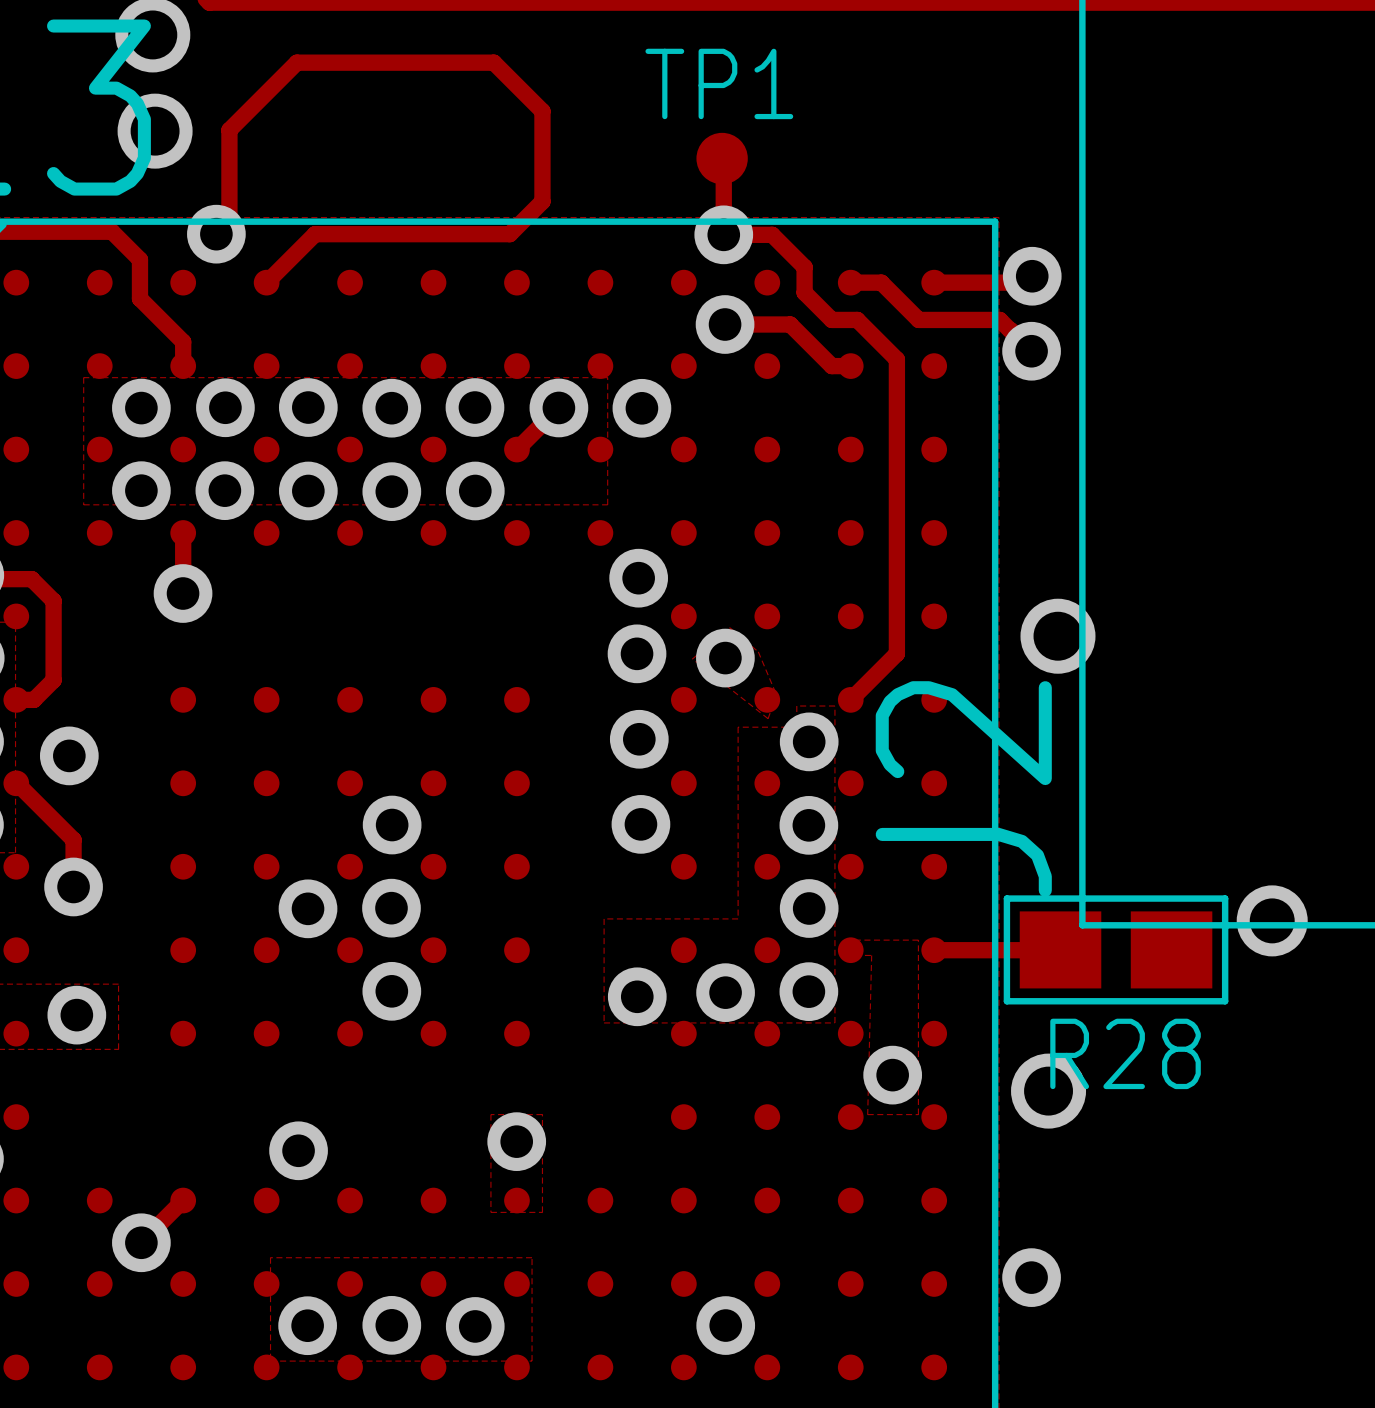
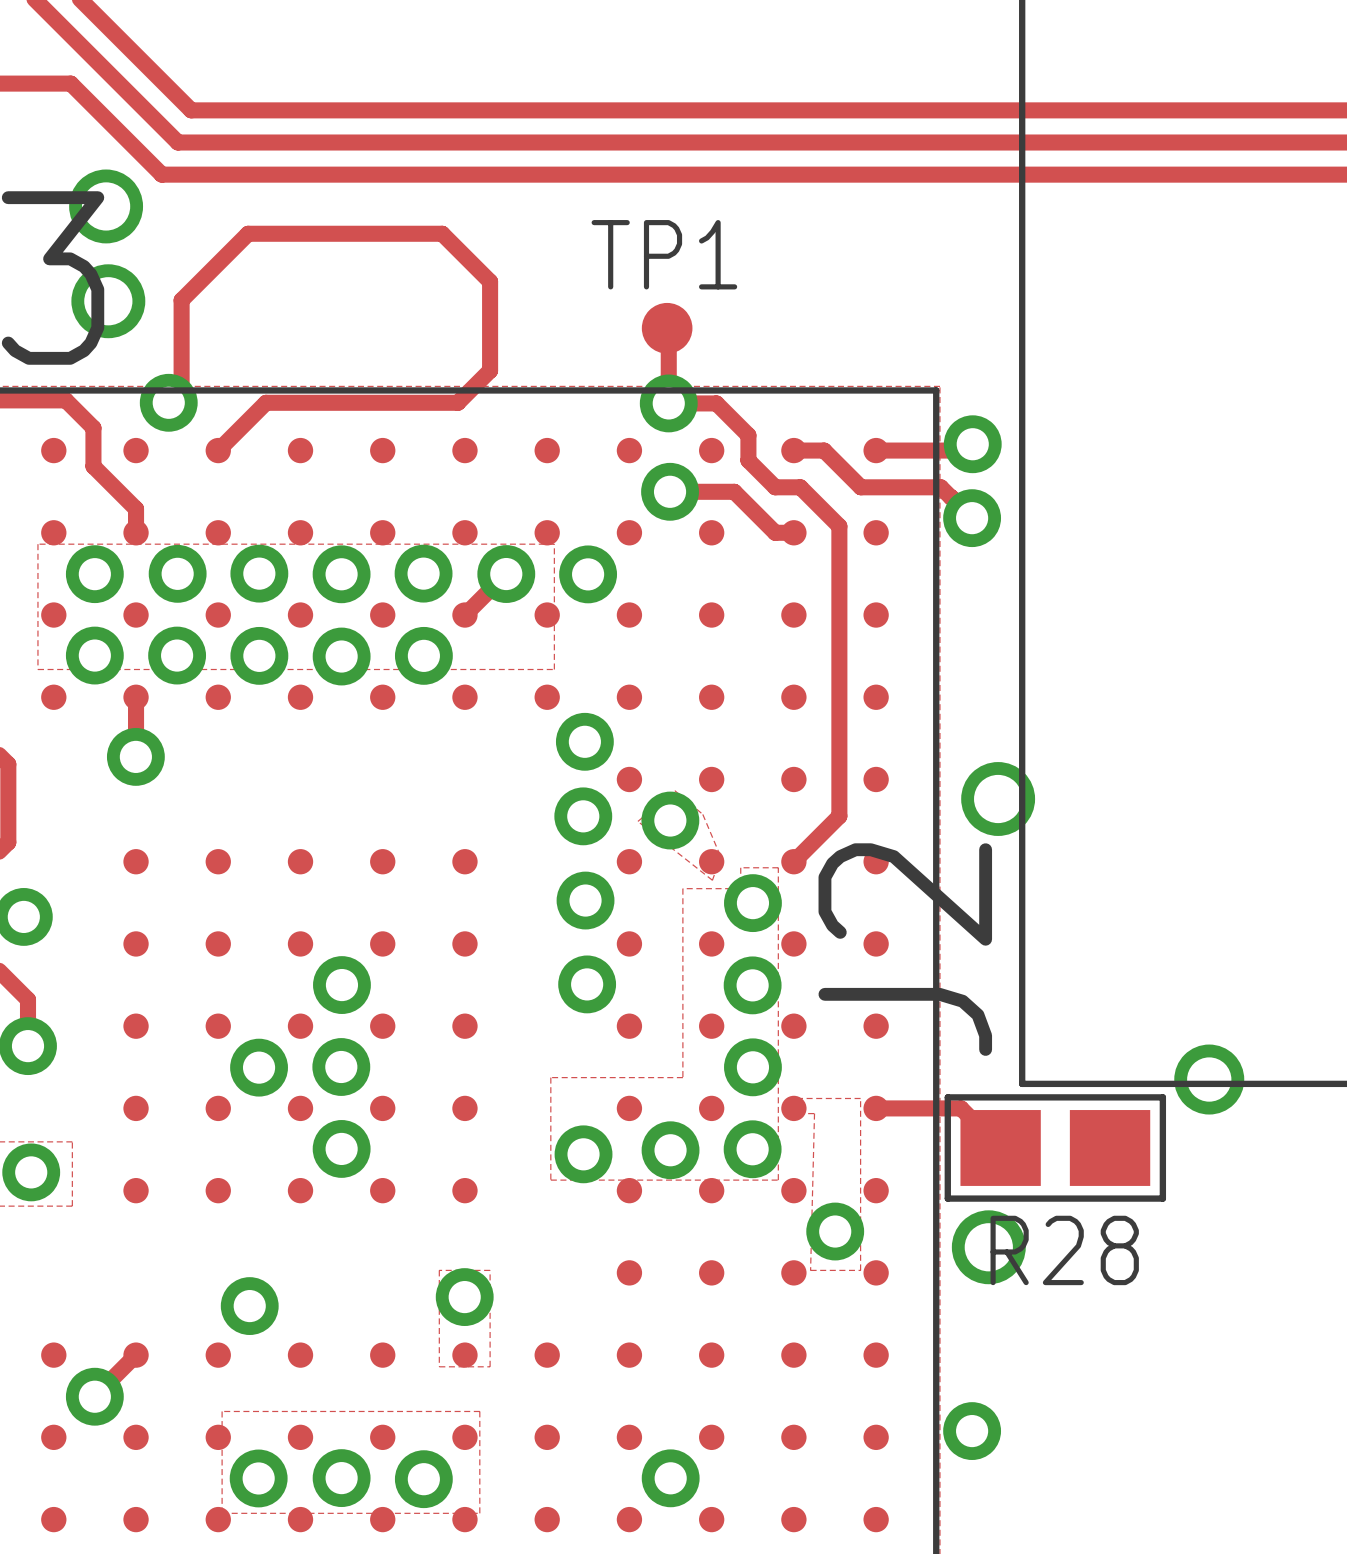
R28 position: (1116, 949) -> (1055, 1147)

